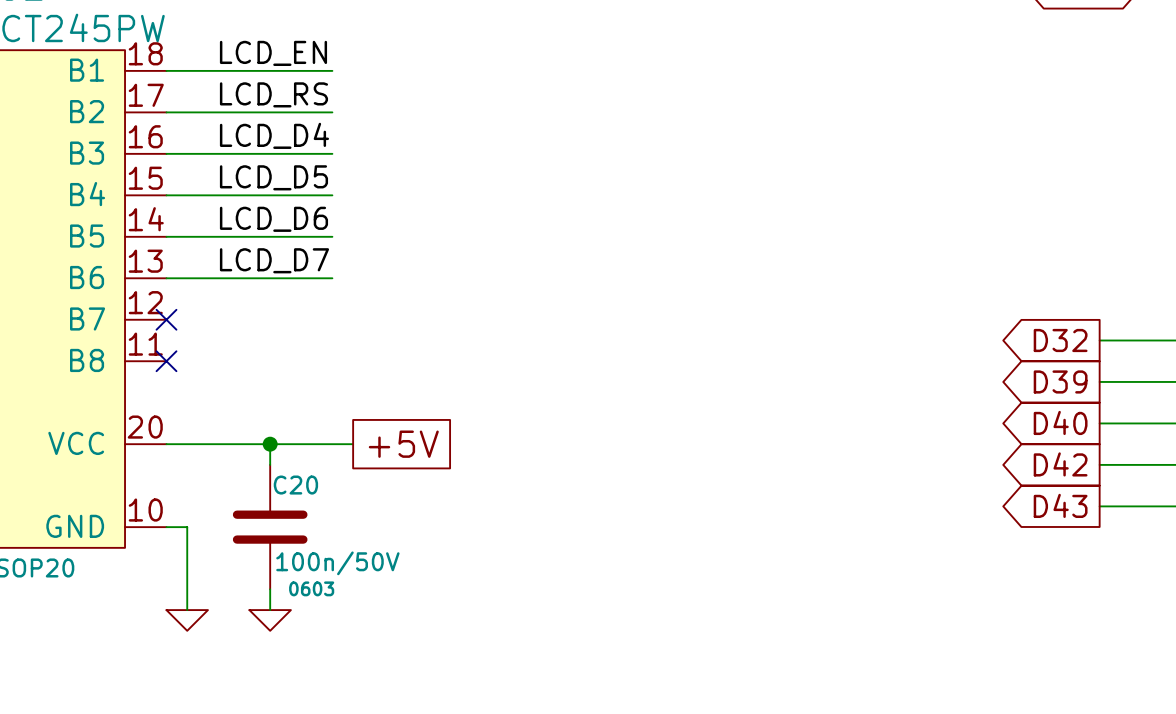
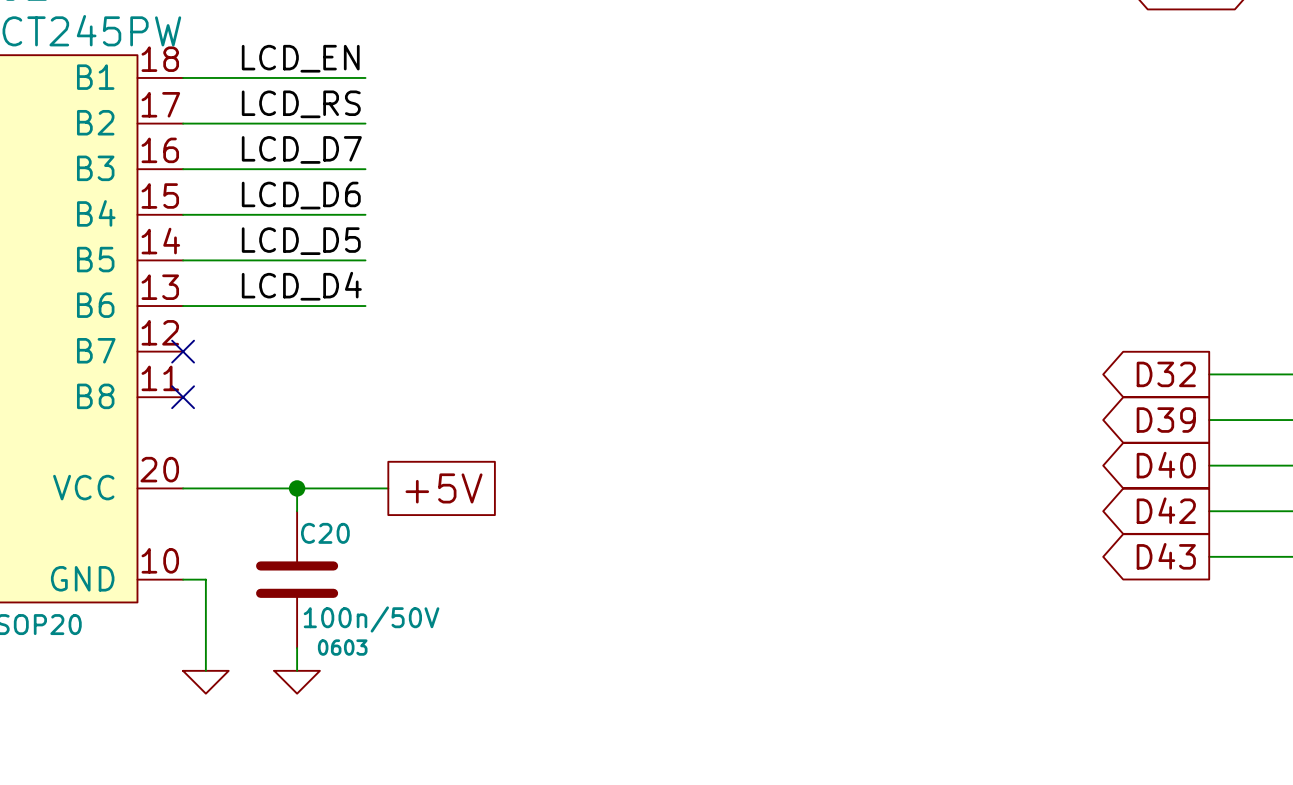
label: LCD_D4 (274, 135) -> LCD_D7 (301, 149)
label: LCD_D5 (273, 177) -> LCD_D6 (301, 195)
label: LCD_D6 (273, 219) -> LCD_D5 (301, 241)
label: LCD_D7 (274, 260) -> LCD_D4 (301, 286)

